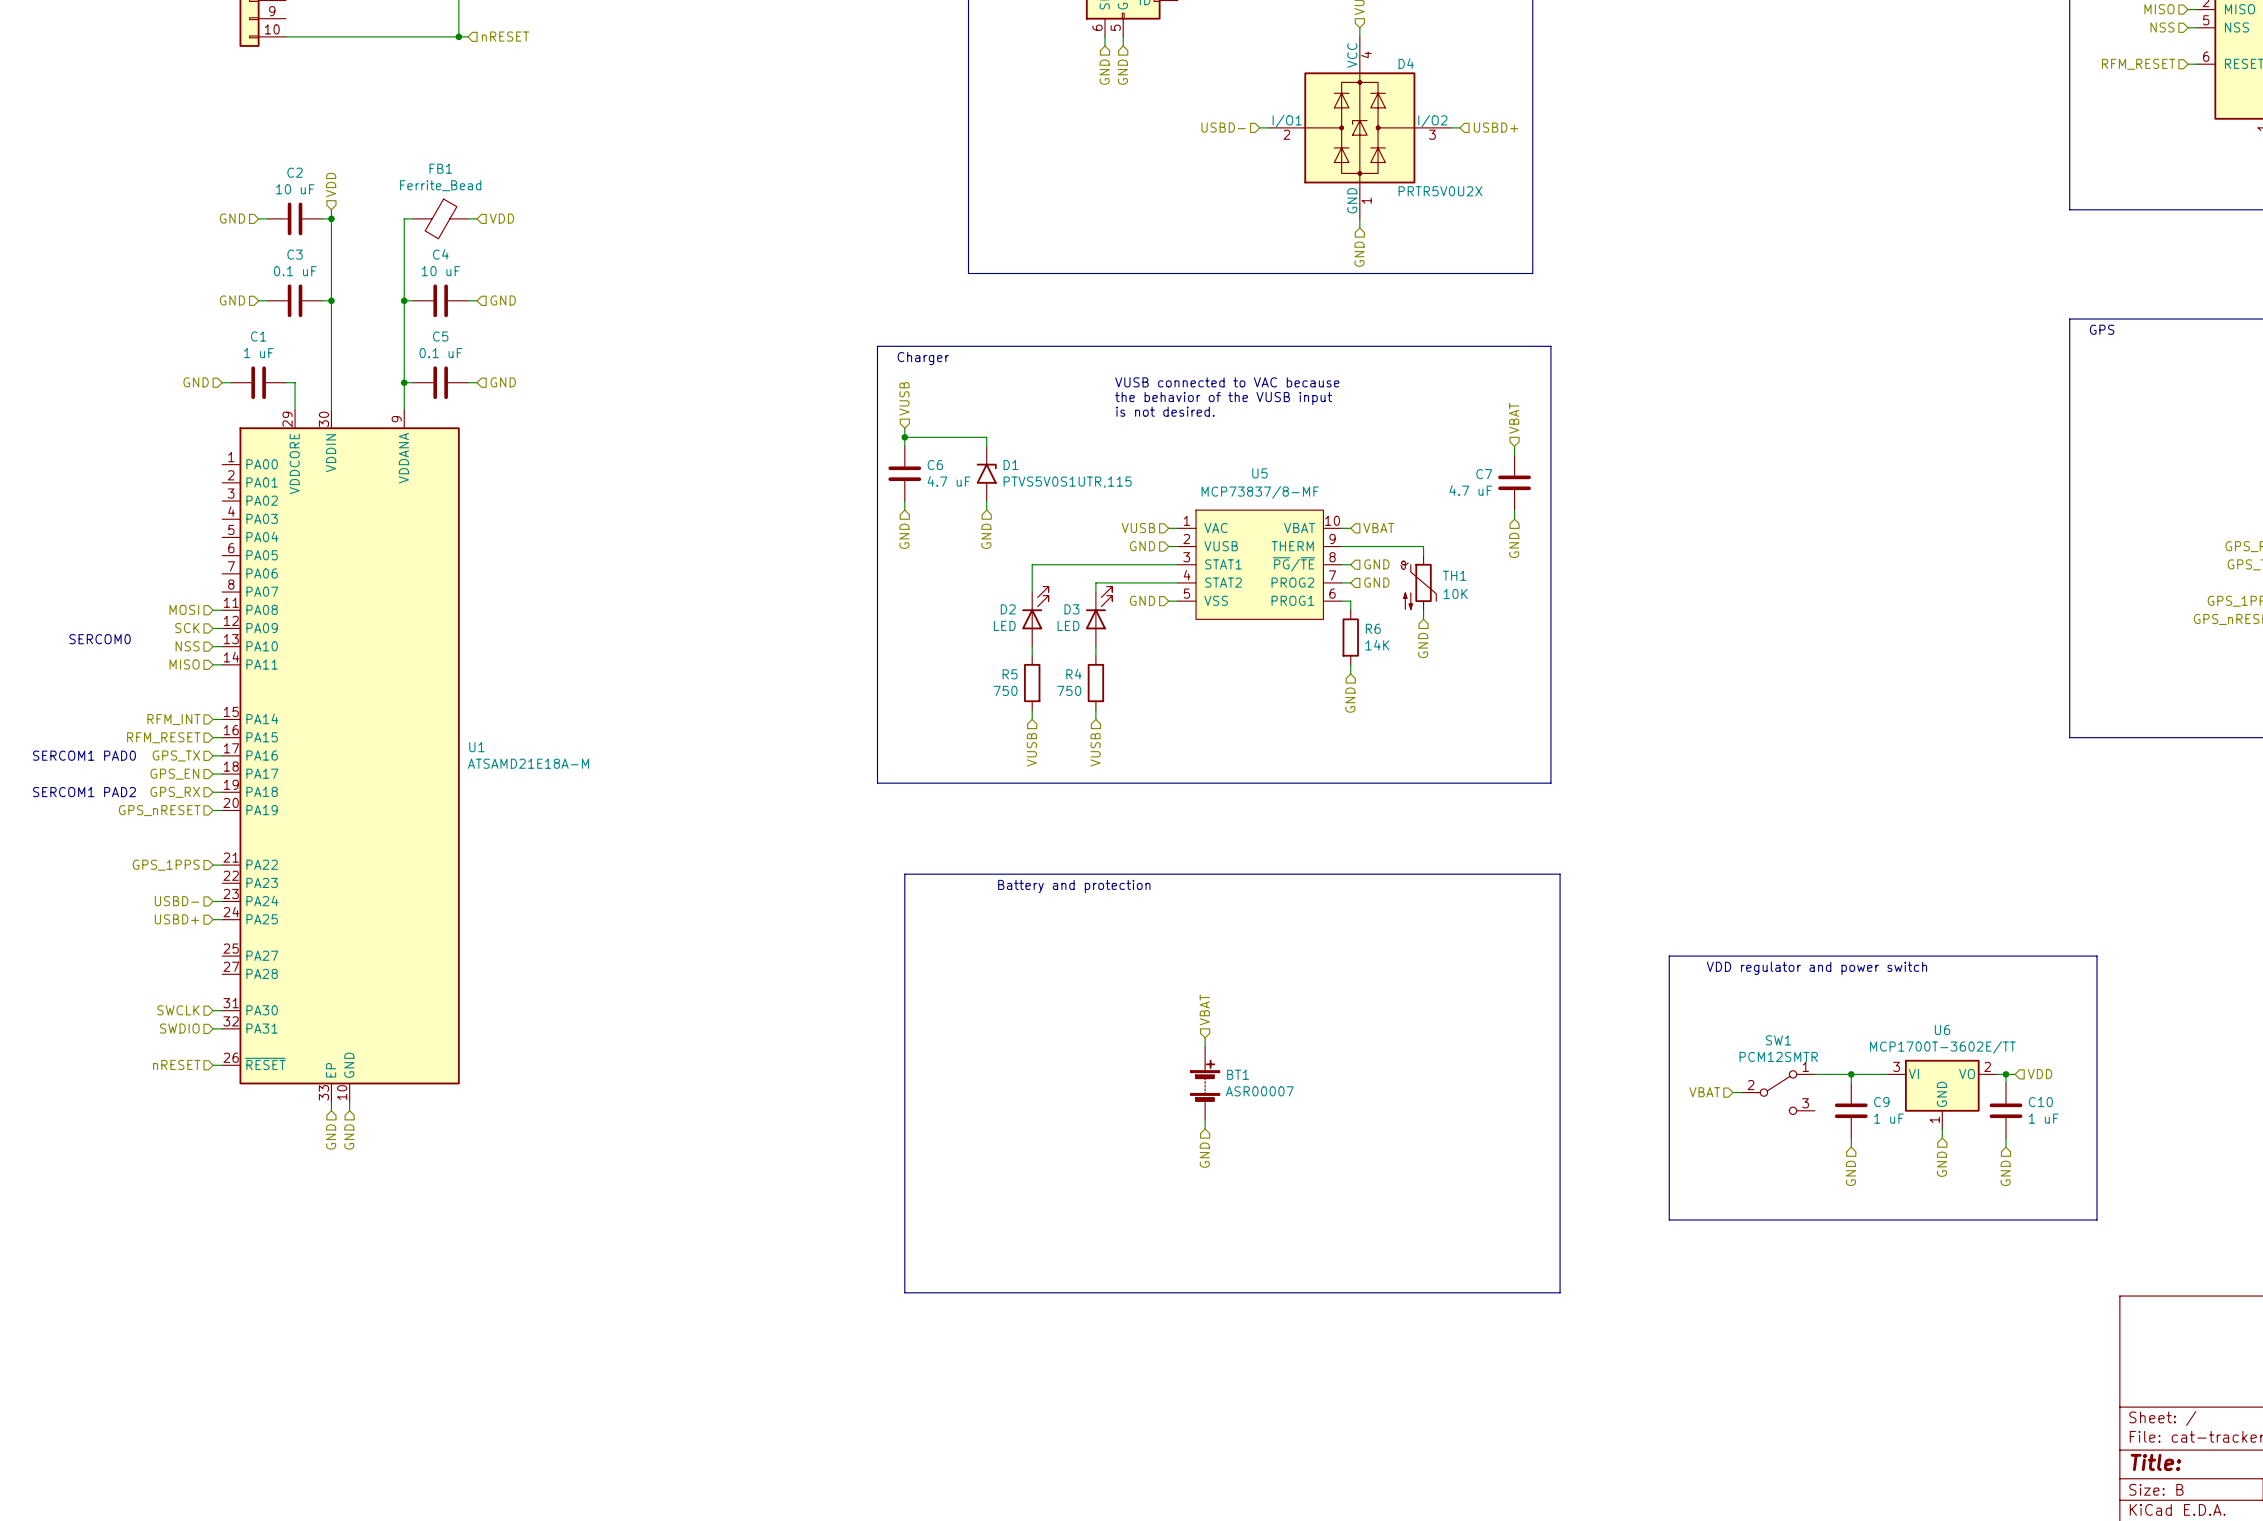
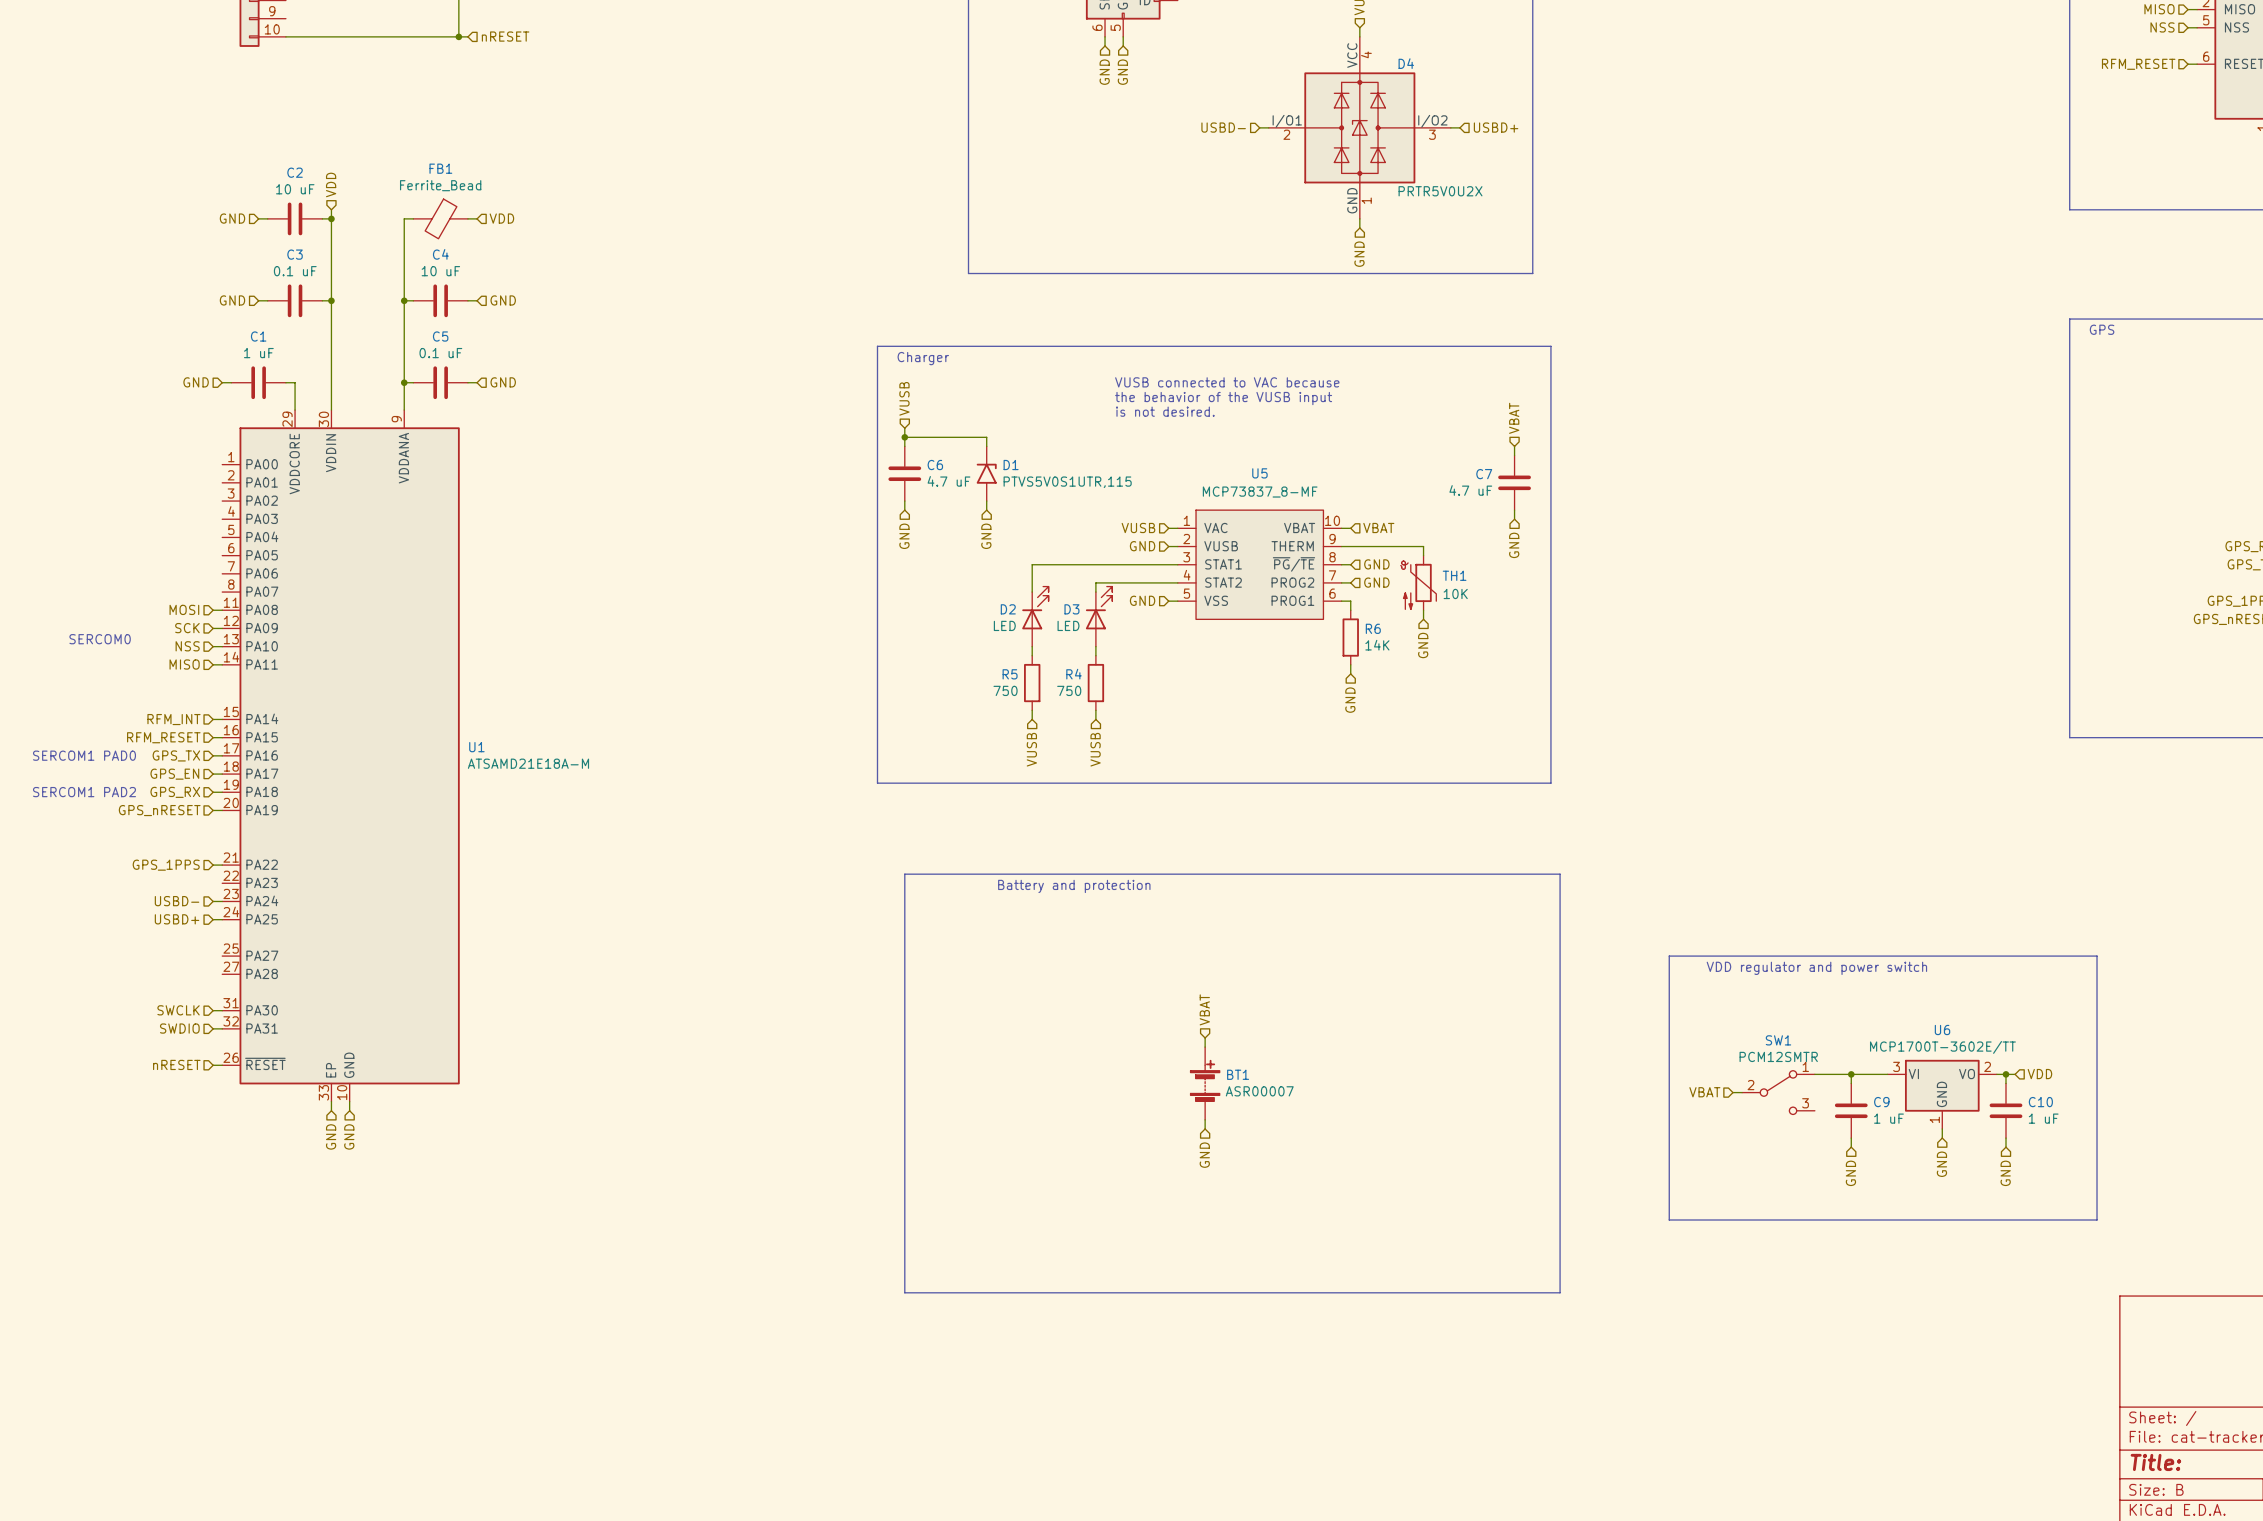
U5 value: MCP73837/8-MF (1260, 492) -> MCP73837_8-MF (1260, 492)

